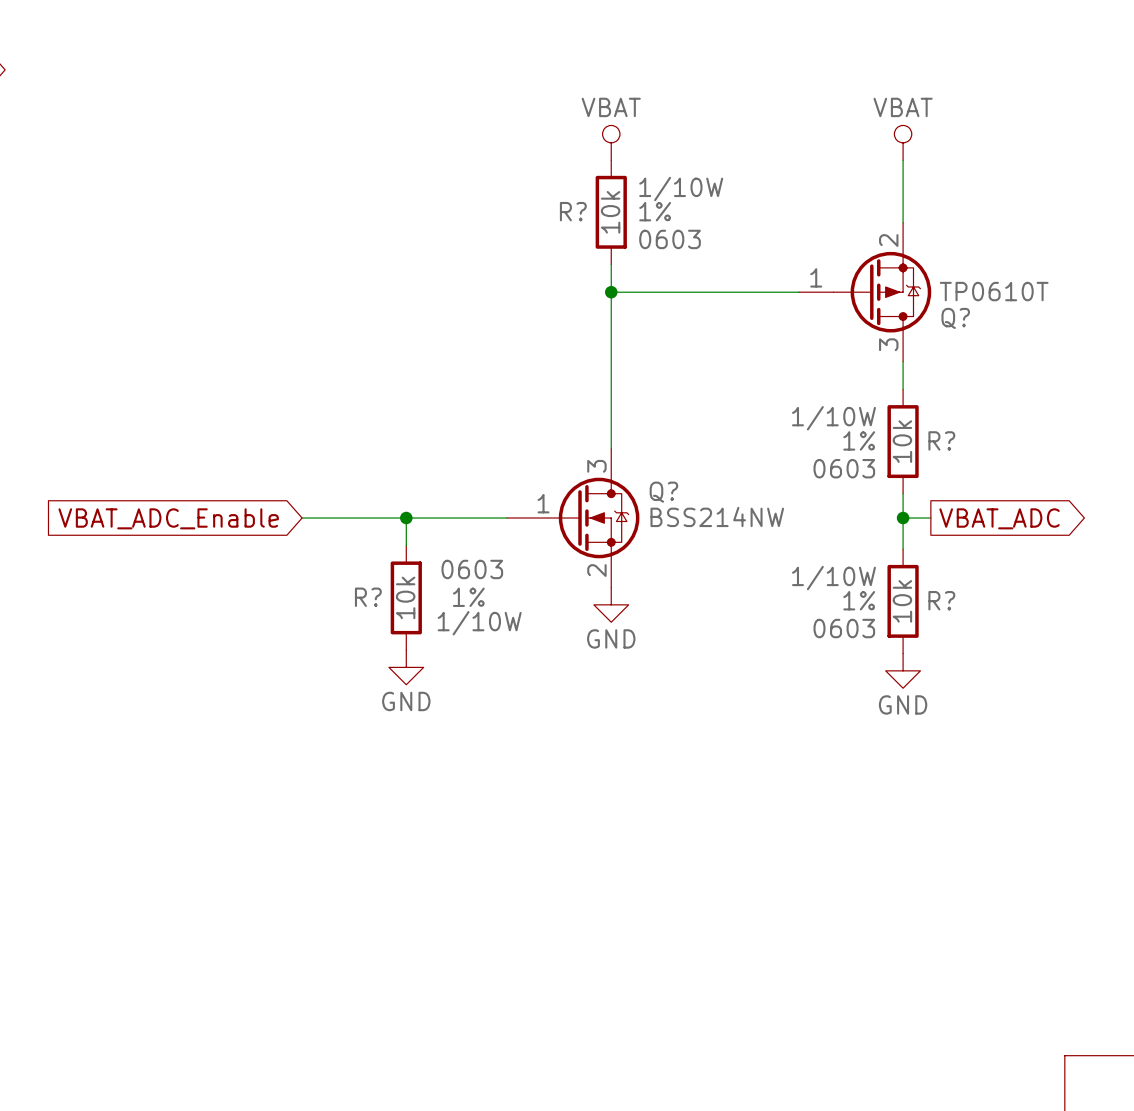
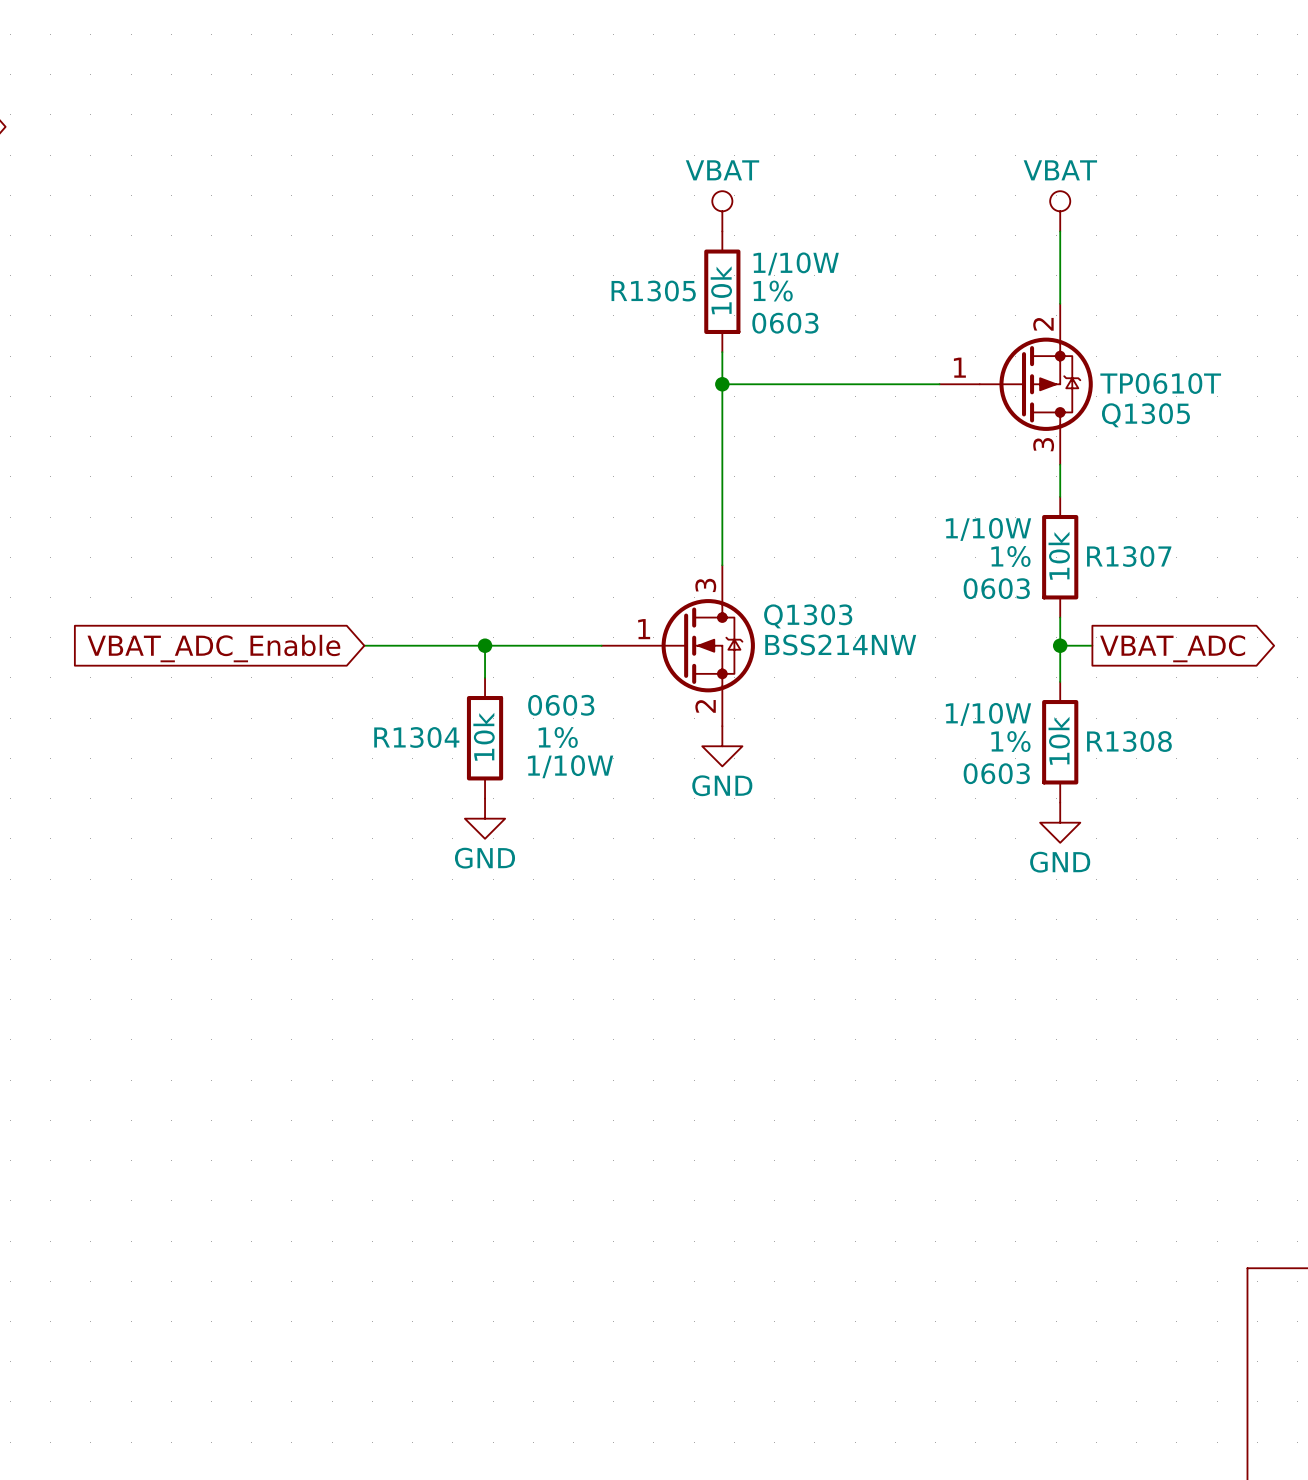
R? name: R? (573, 211) -> R1305 (653, 291)
Q? name: Q? (955, 318) -> Q1305 (1145, 415)
R? name: R? (941, 440) -> R1307 (1129, 556)
Q? name: Q? (663, 492) -> Q1303 (808, 616)
R? name: R? (368, 597) -> R1304 (416, 737)
R? name: R? (941, 600) -> R1308 (1129, 741)

